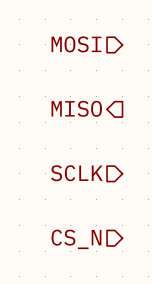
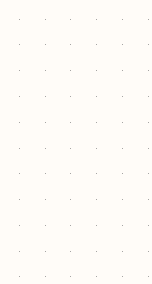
hierarchical label: MOSI (76, 44) -> none
hierarchical label: MISO (76, 108) -> none
hierarchical label: SCLK (76, 173) -> none
hierarchical label: CS_N (76, 239) -> none

